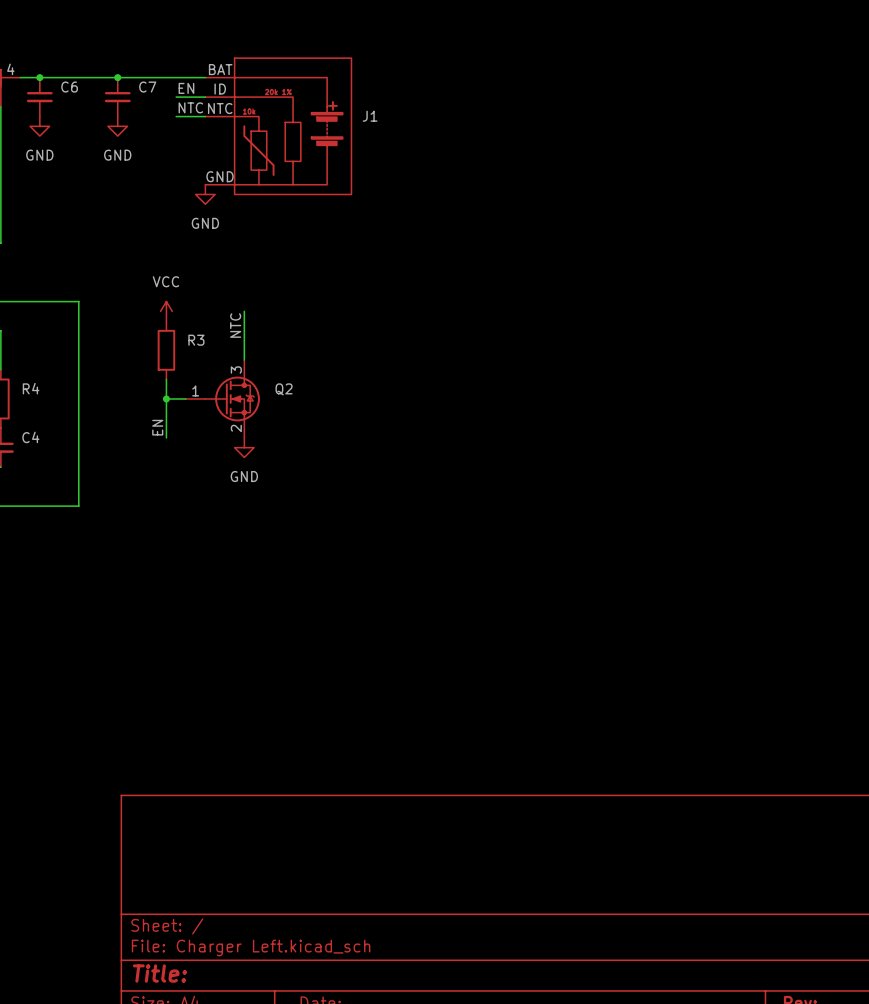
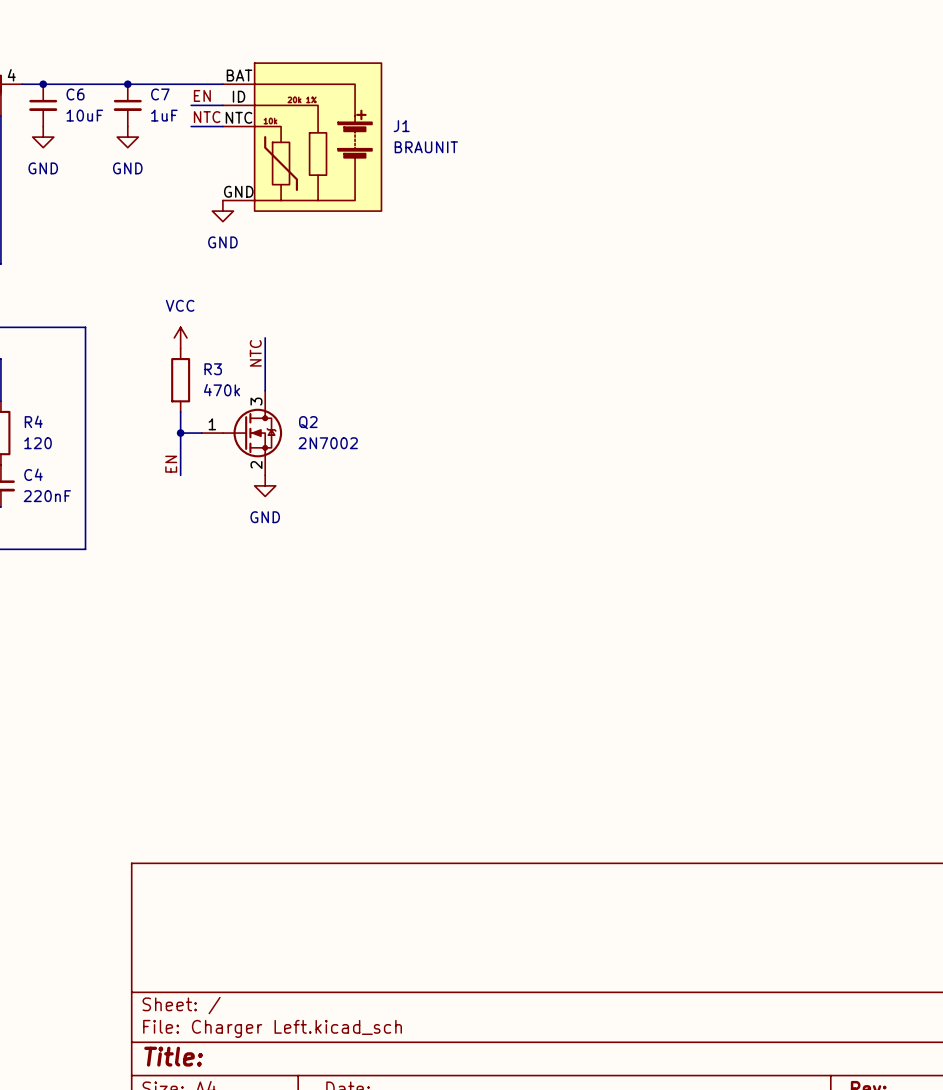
C6 value: none -> 10uF (84, 115)
C7 value: none -> 1uF (164, 115)
J1 value: none -> BRAUNIT (426, 147)
R3 value: none -> 470k (221, 390)
R4 value: none -> 120 (38, 443)
Q2 value: none -> 2N7002 (328, 443)
C4 value: none -> 220nF (47, 496)

